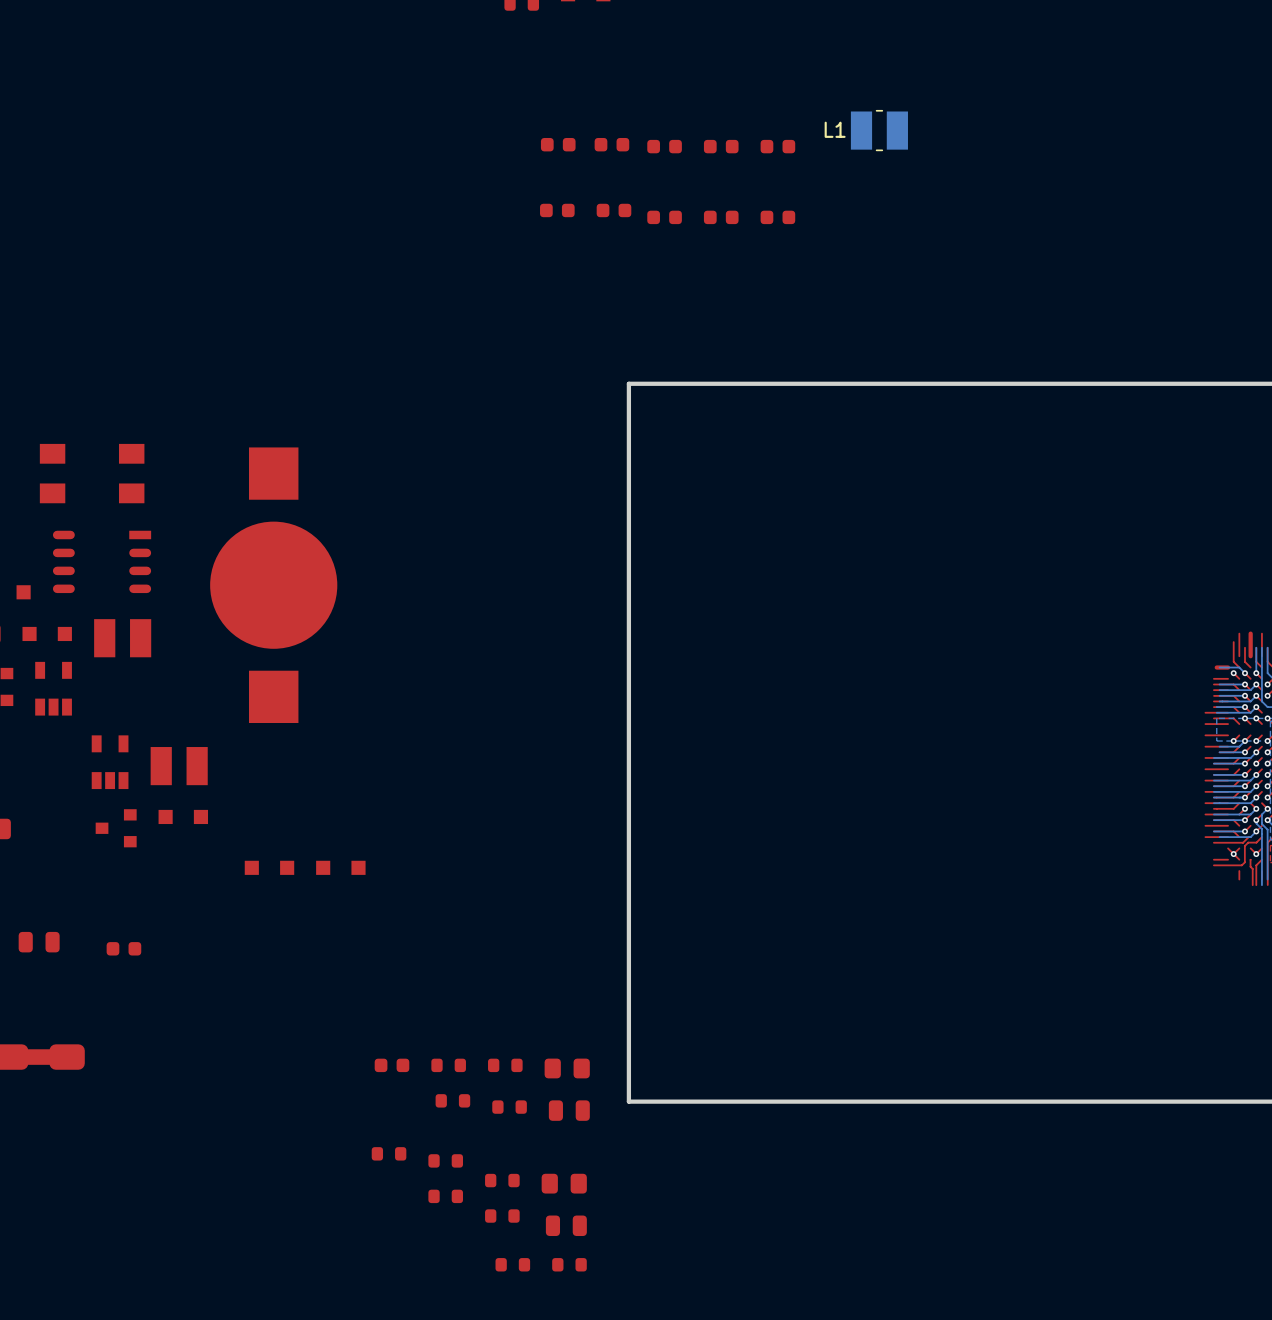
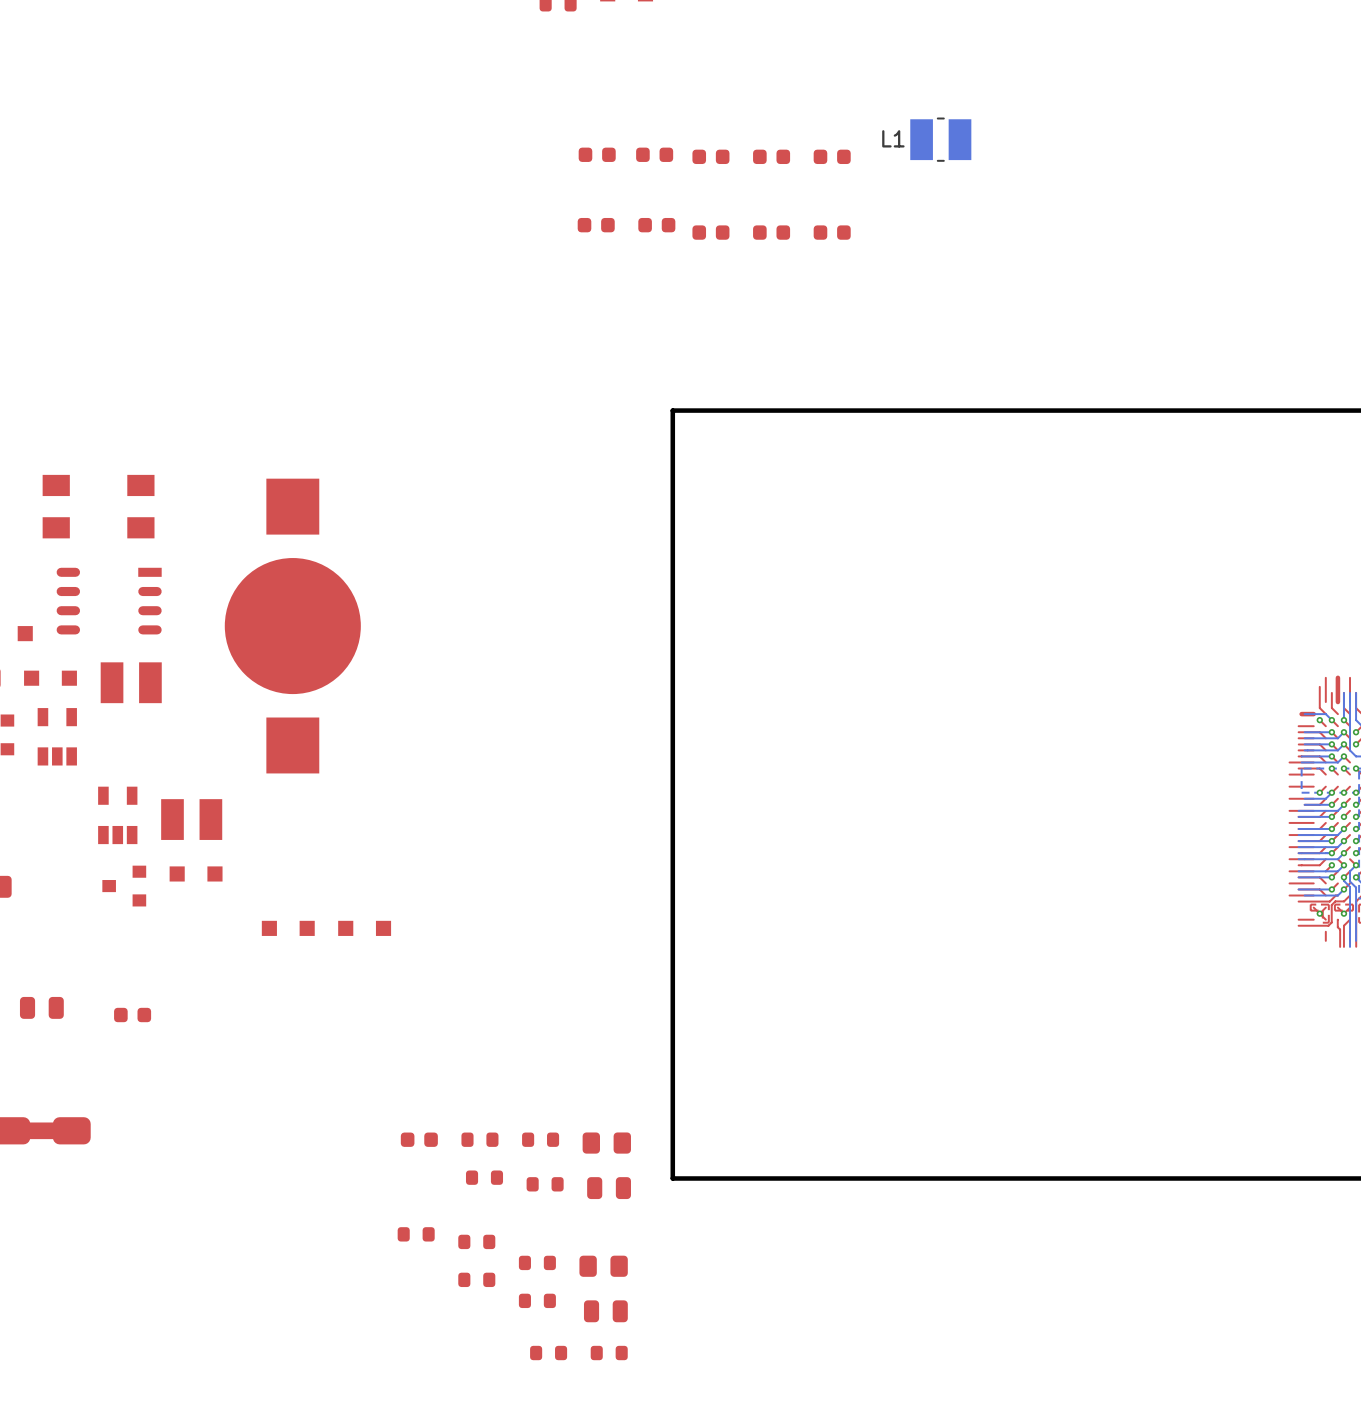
top zone outline: none -> (1328, 904) (1310, 904) (1310, 910) (1322, 910) (1322, 922) (1328, 922) (1328, 904)
top zone outline: none -> (1353, 904) (1334, 904) (1334, 910) (1353, 910) (1353, 904)

